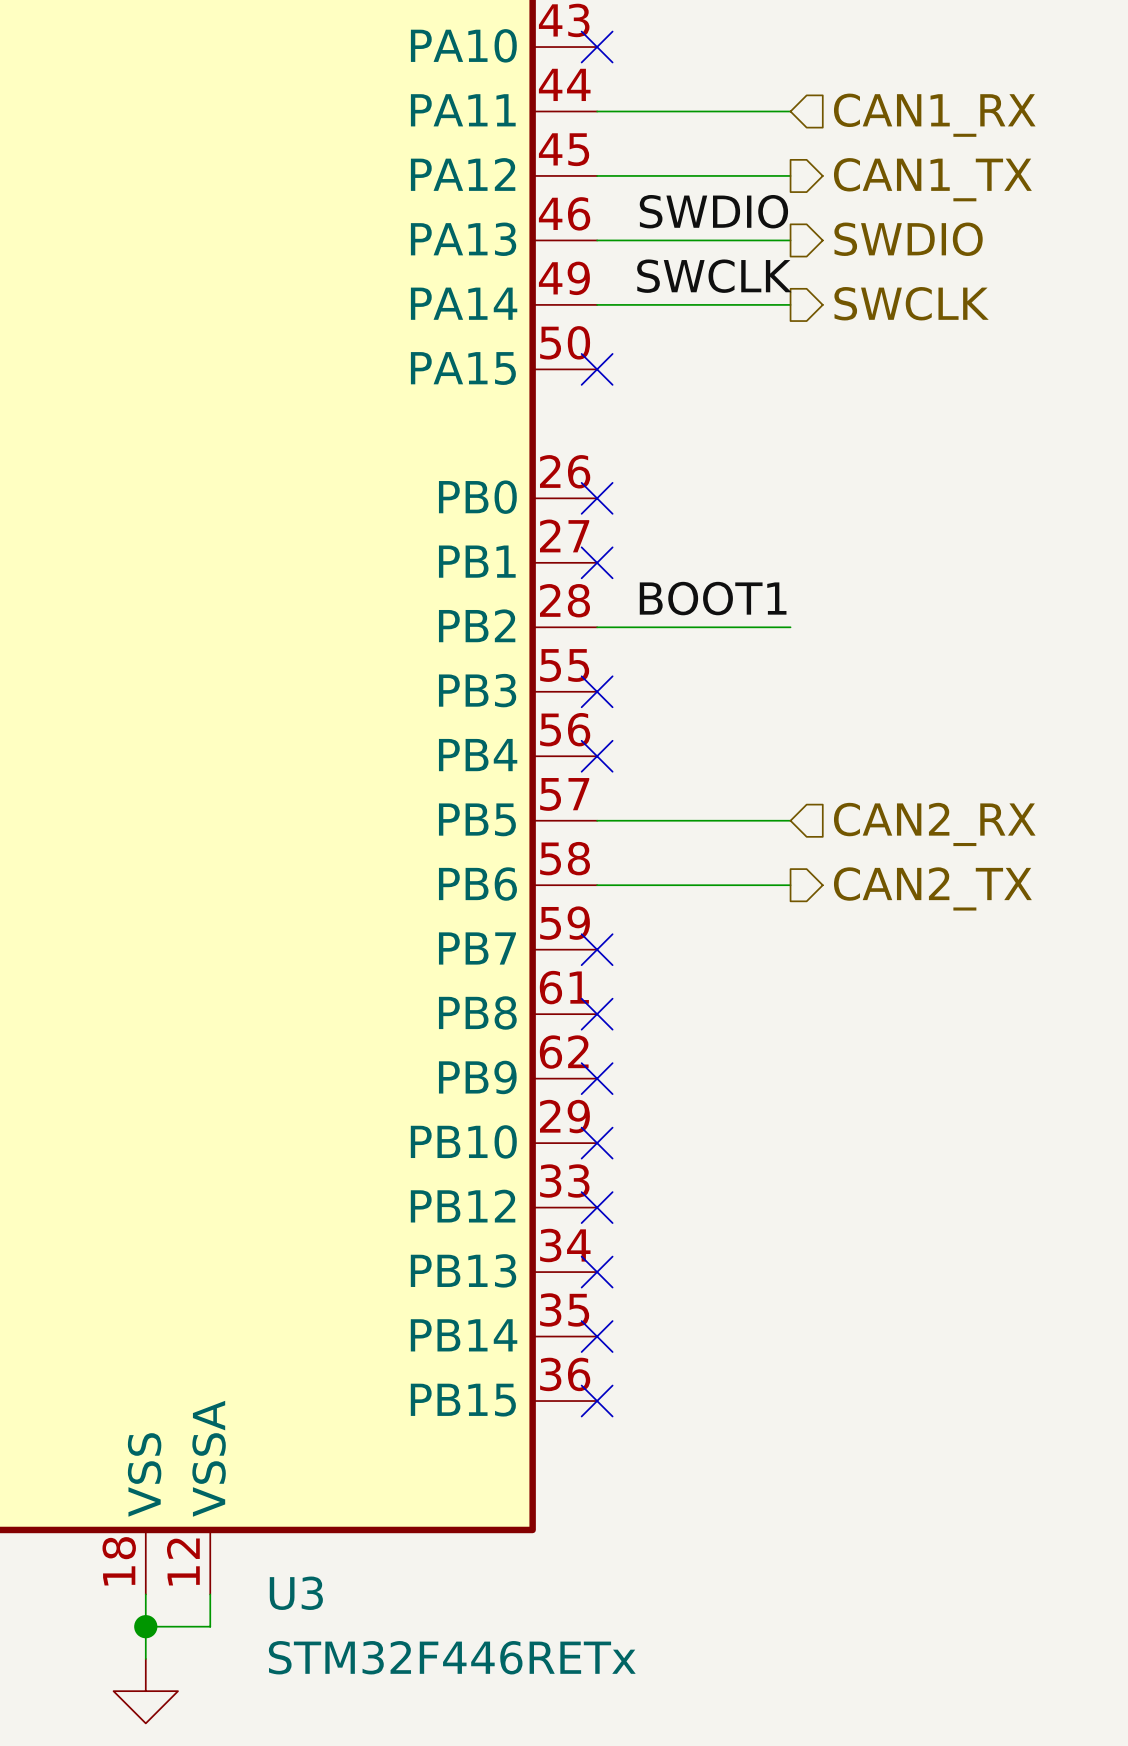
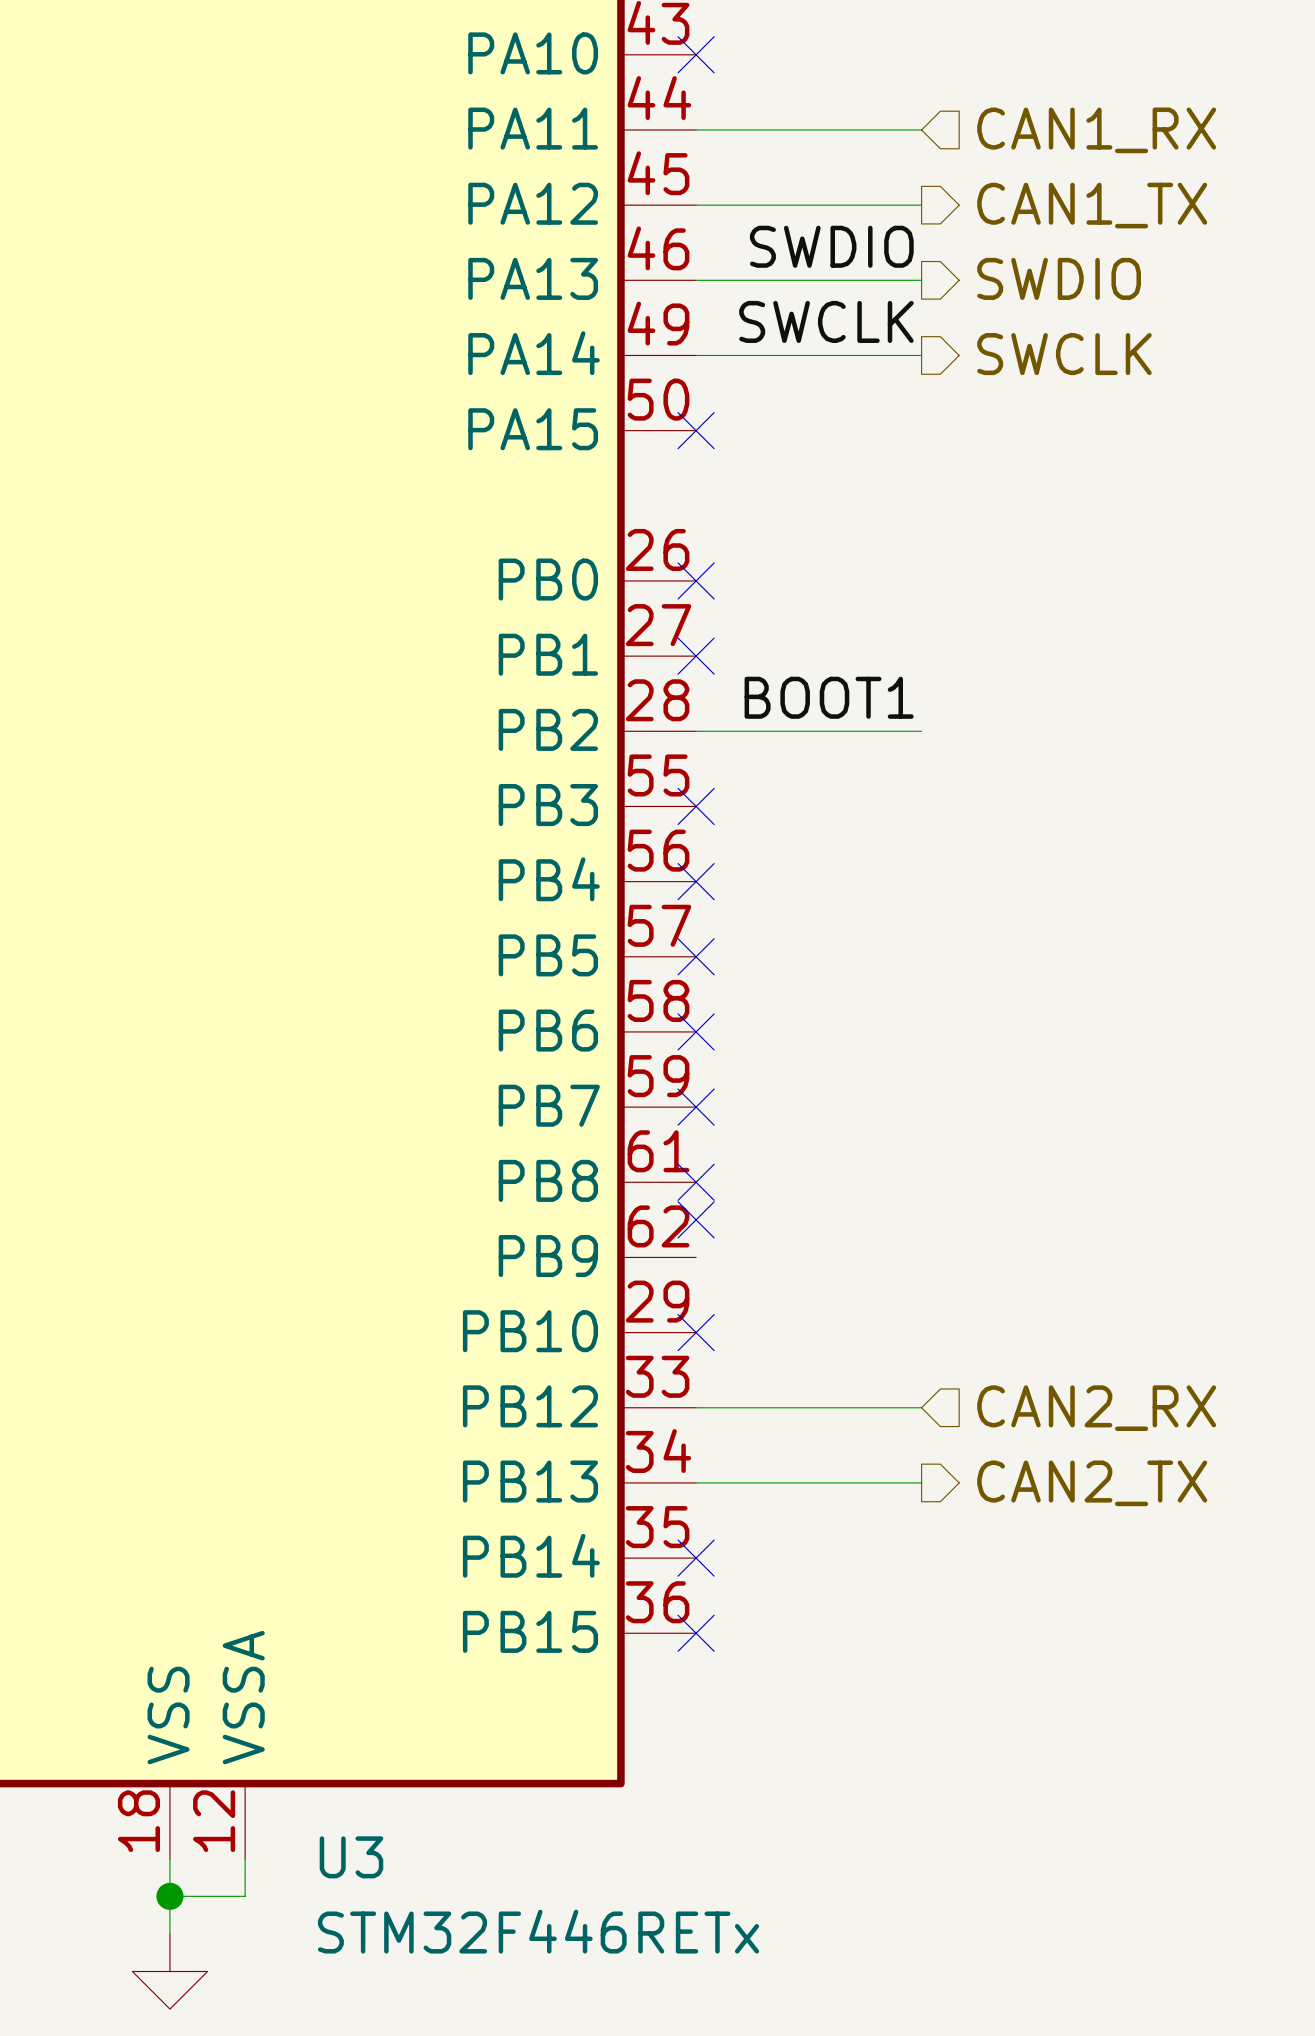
wire: (597, 820) (790, 820) -> (696, 1407) (921, 1407)
no-connect mark: none -> (696, 956)
hierarchical label position: CAN2_RX (934, 824) -> CAN2_RX (1096, 1408)
wire: (597, 885) (790, 885) -> (696, 1482) (921, 1482)
no-connect mark: none -> (696, 1031)
hierarchical label position: CAN2_TX (932, 888) -> CAN2_TX (1092, 1483)
no-connect mark position: (597, 1078) -> (696, 1219)
no-connect mark: (597, 1207) -> none
no-connect mark: (597, 1272) -> none

